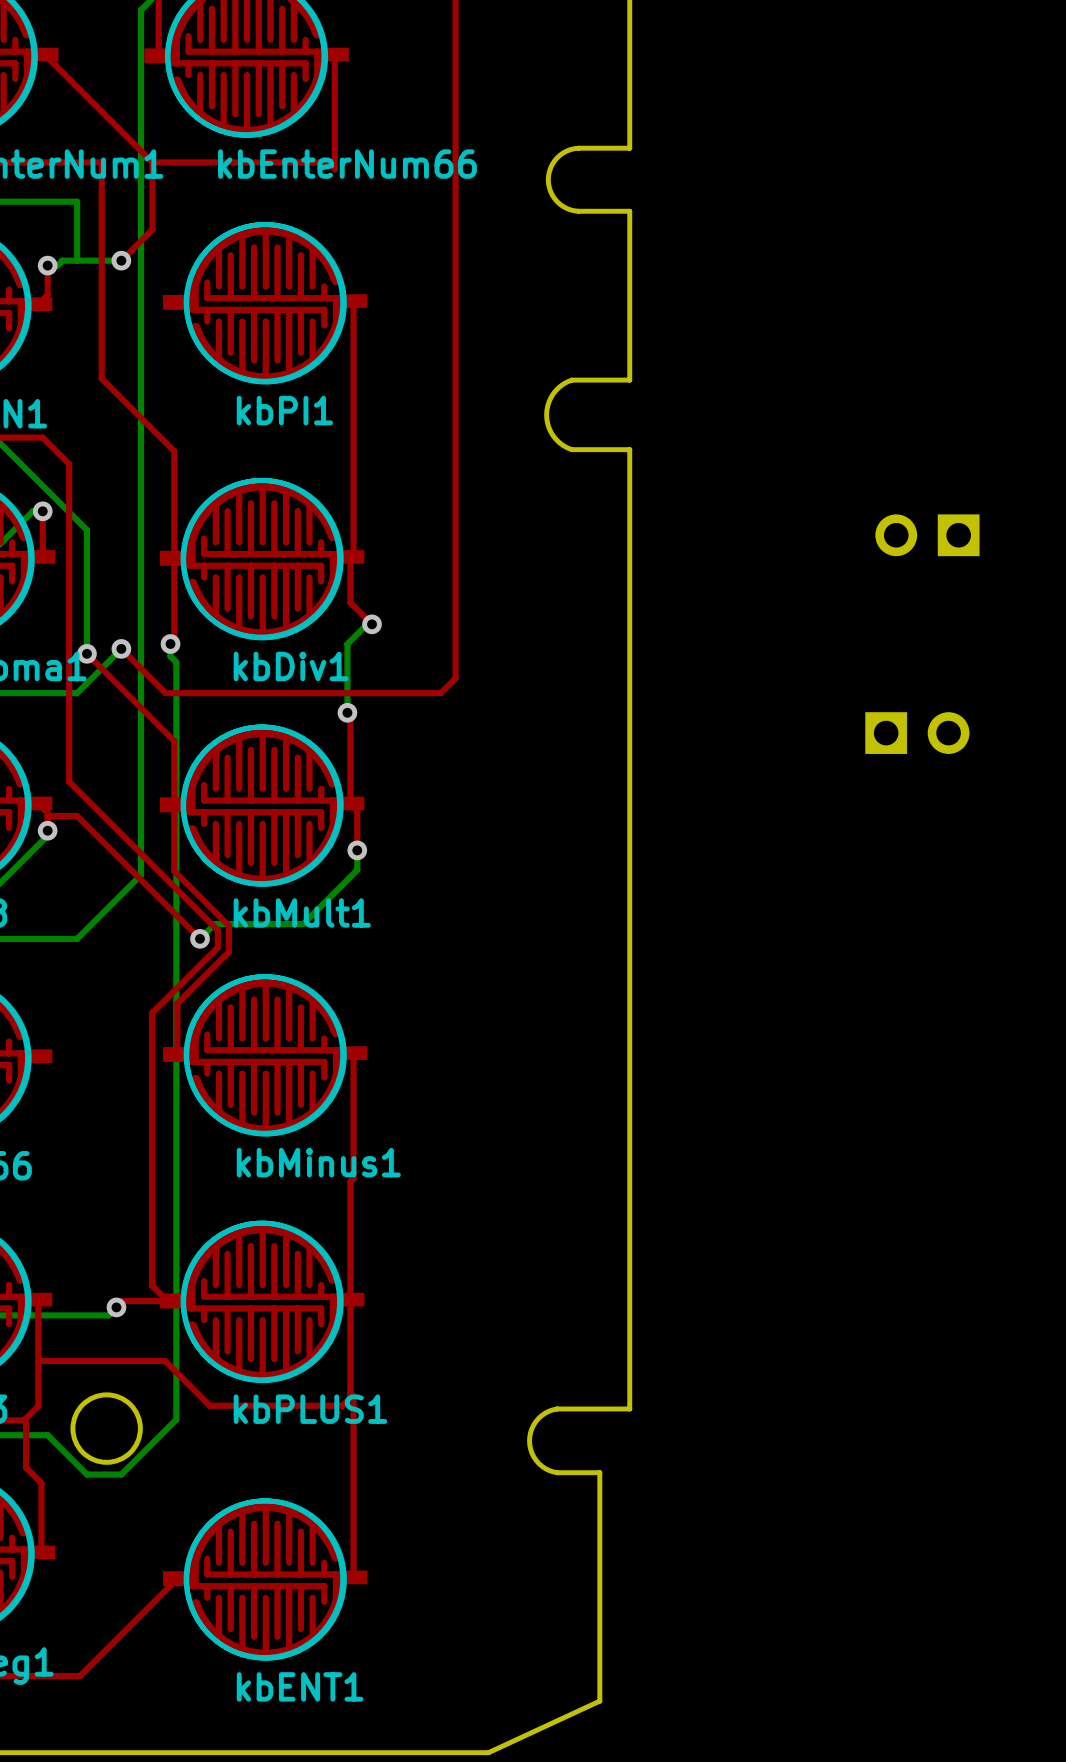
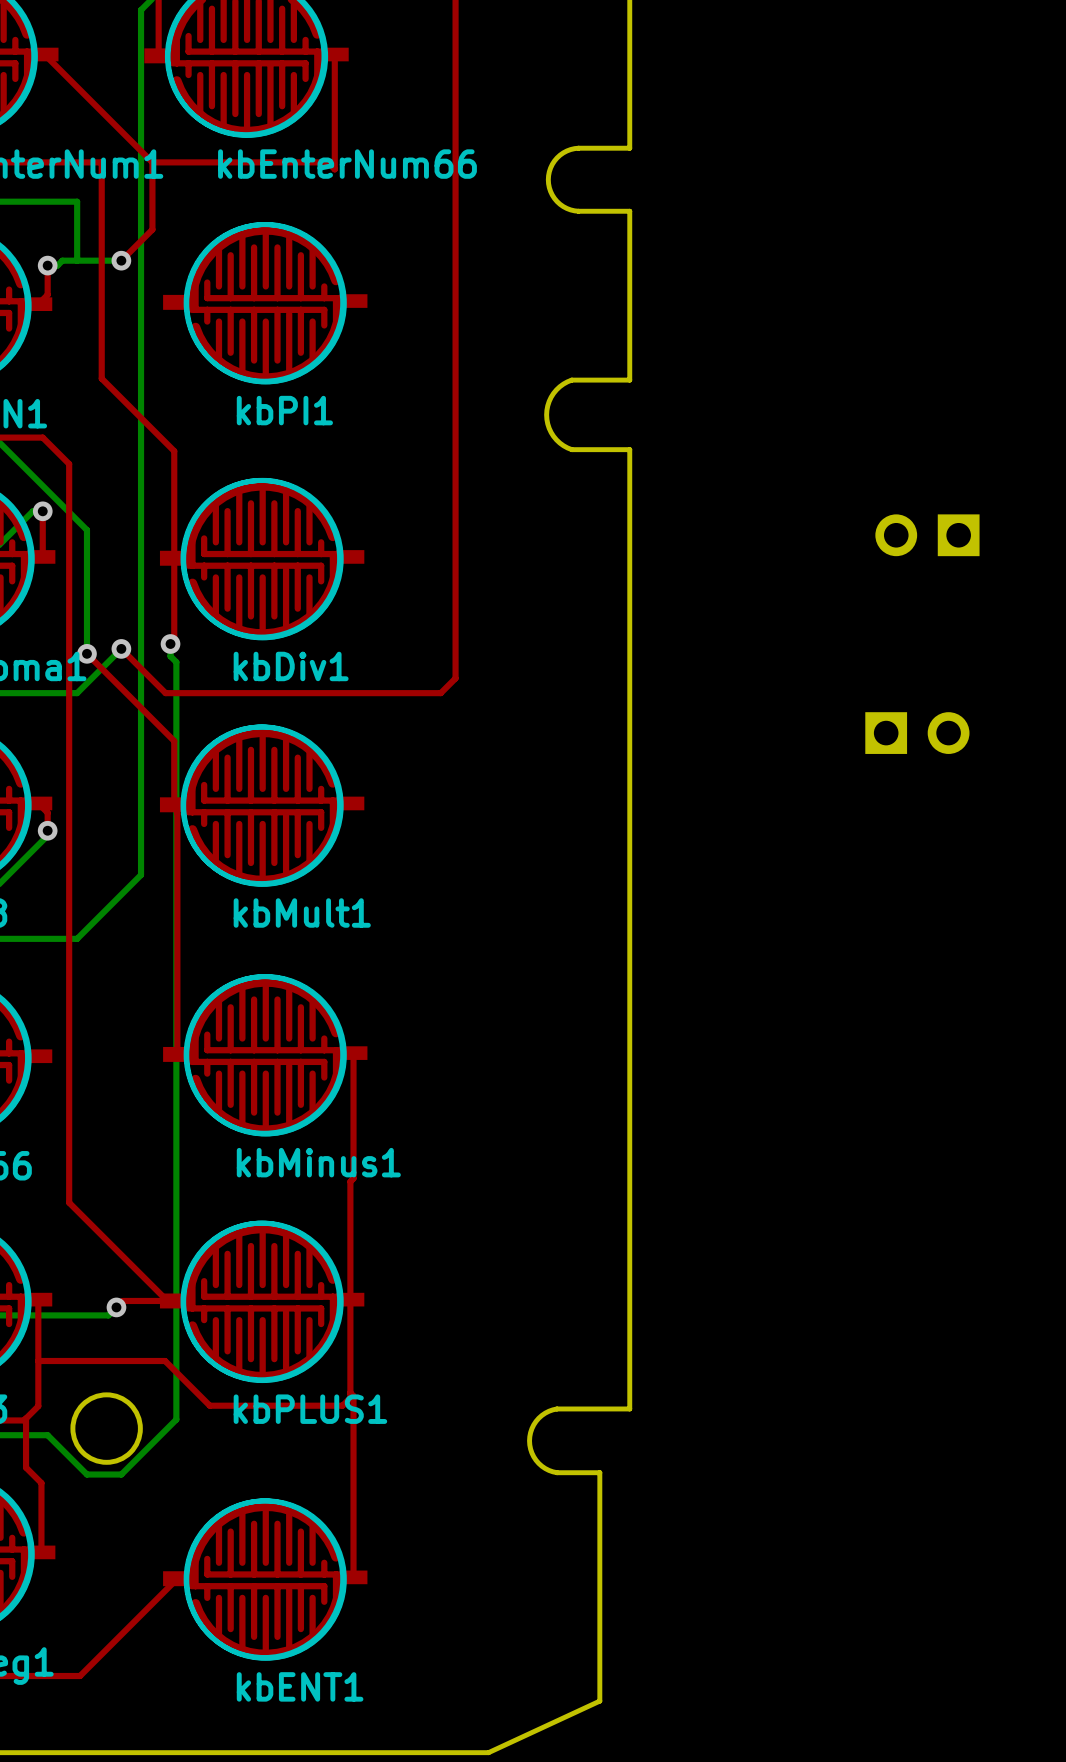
top track: (353, 301) (353, 553) (350, 556) (350, 602) (372, 624) -> none
bottom track: (372, 624) (367, 624) (347, 643) (347, 712) -> none
via: (372, 624) -> none
top track: (347, 712) (350, 715) (350, 803) (357, 810) (357, 850) -> none
via: (347, 712) -> none
top track: (69, 781) (217, 930) (217, 947) (152, 1013) (152, 1285) -> (69, 781) (69, 1202) (152, 1285)
top track: (174, 804) (174, 871) (228, 925) (228, 951) (177, 1003) -> (174, 804) (177, 813) (177, 1003)
top track: (47, 816) (77, 816) (200, 938) -> none
bottom track: (357, 850) (357, 870) (303, 924) (214, 924) (200, 938) -> none
via: (357, 850) -> none
via: (200, 938) -> none

